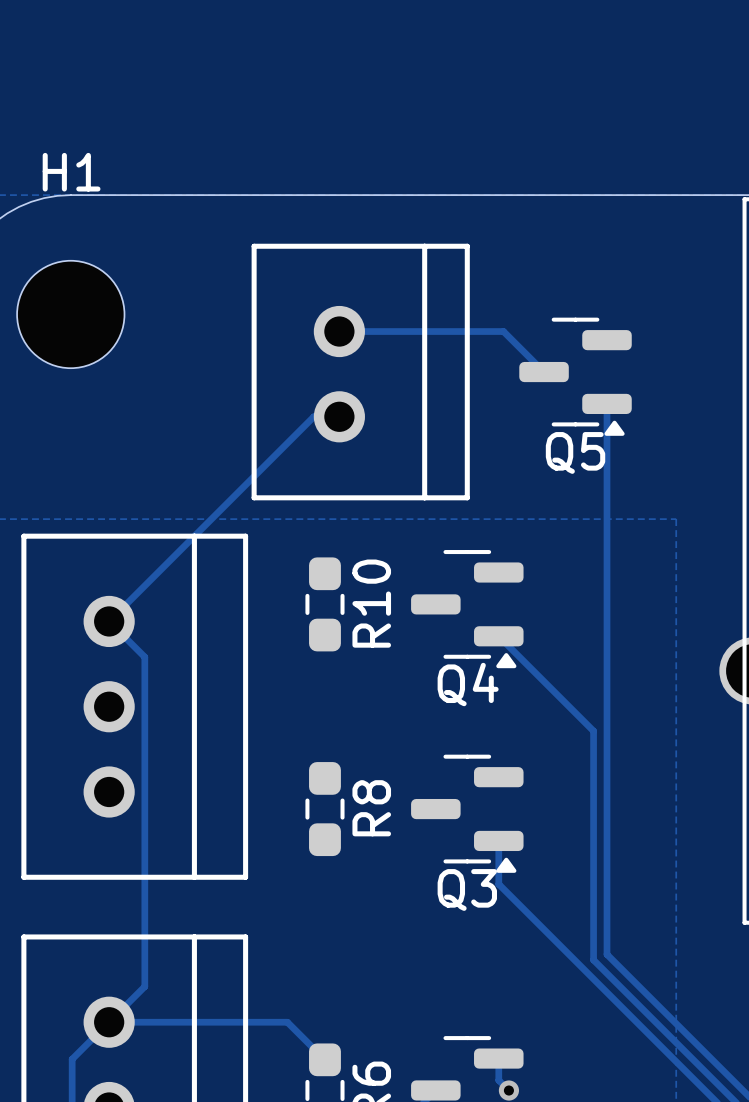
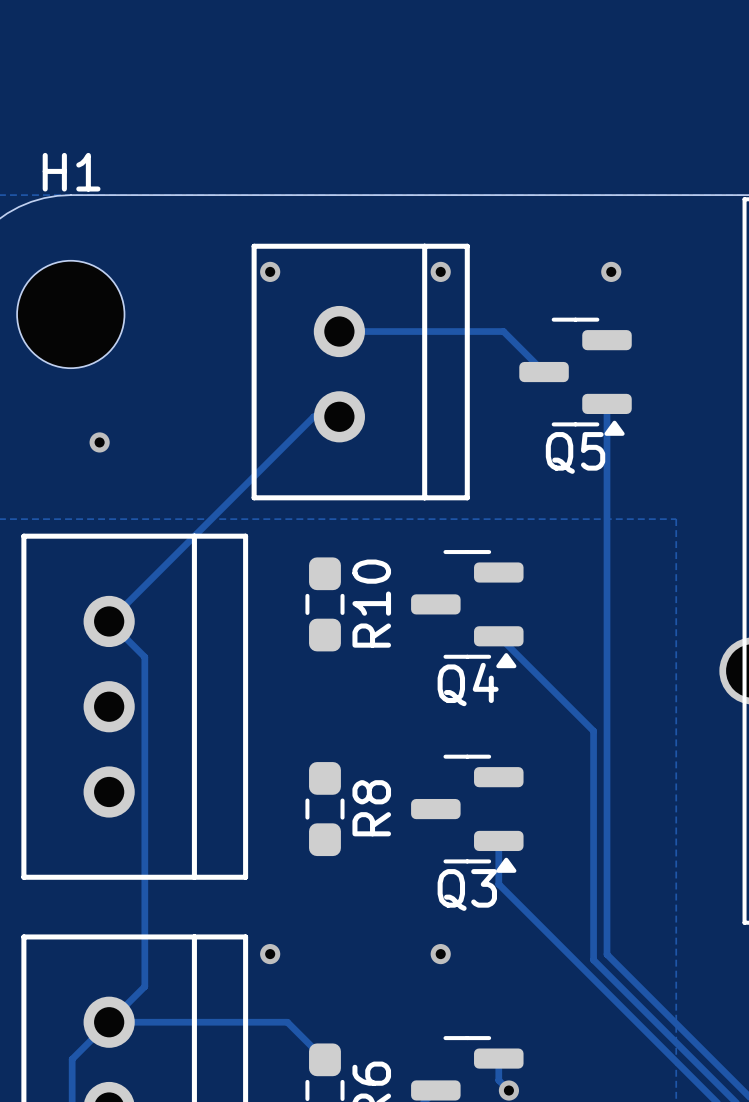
via: none -> (270, 271)
via: none -> (440, 271)
via: none -> (611, 271)
via: none -> (99, 442)
via: none -> (270, 954)
via: none -> (440, 954)

